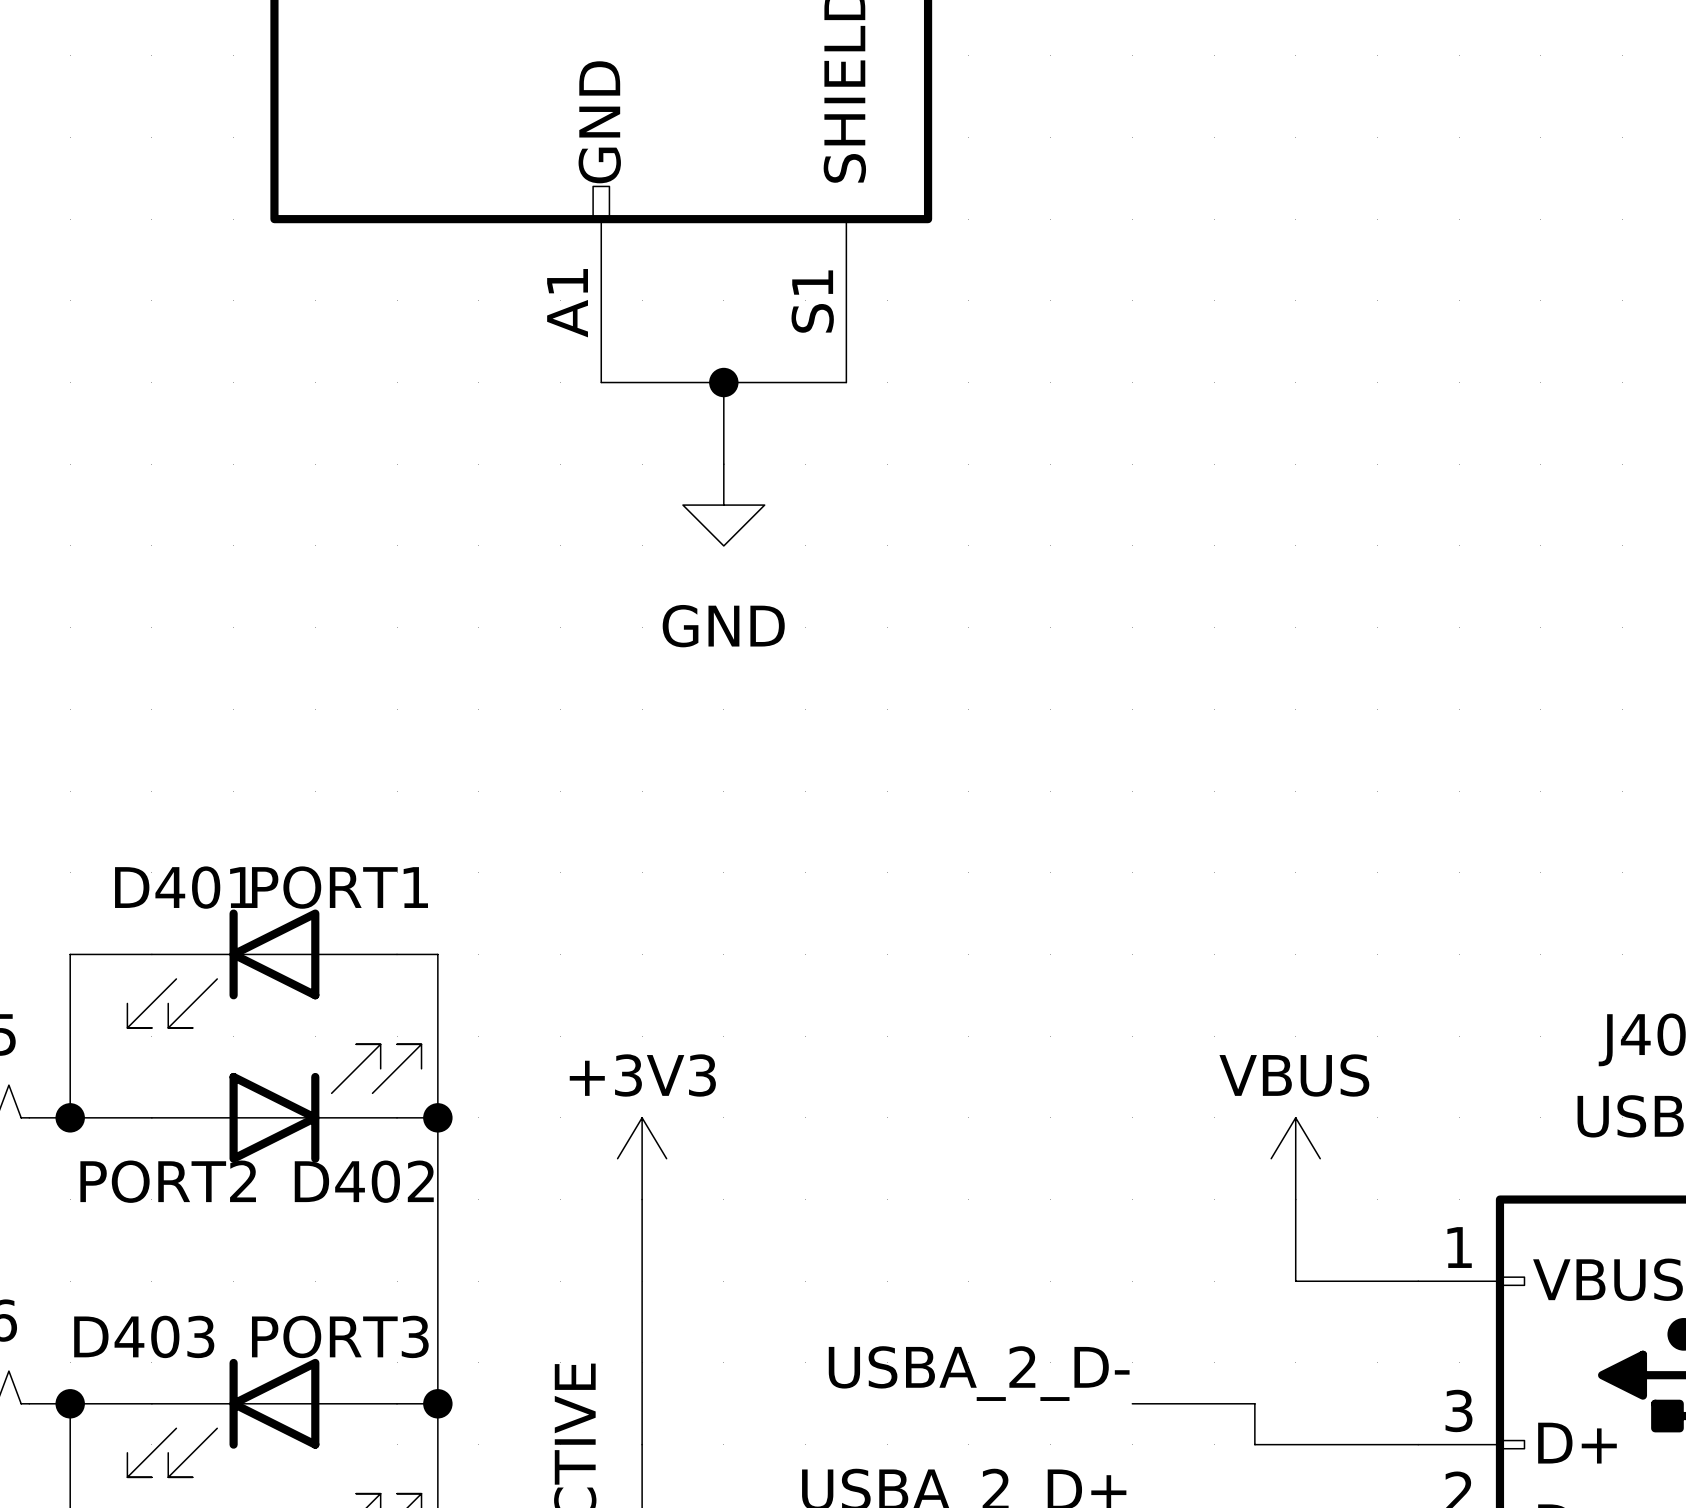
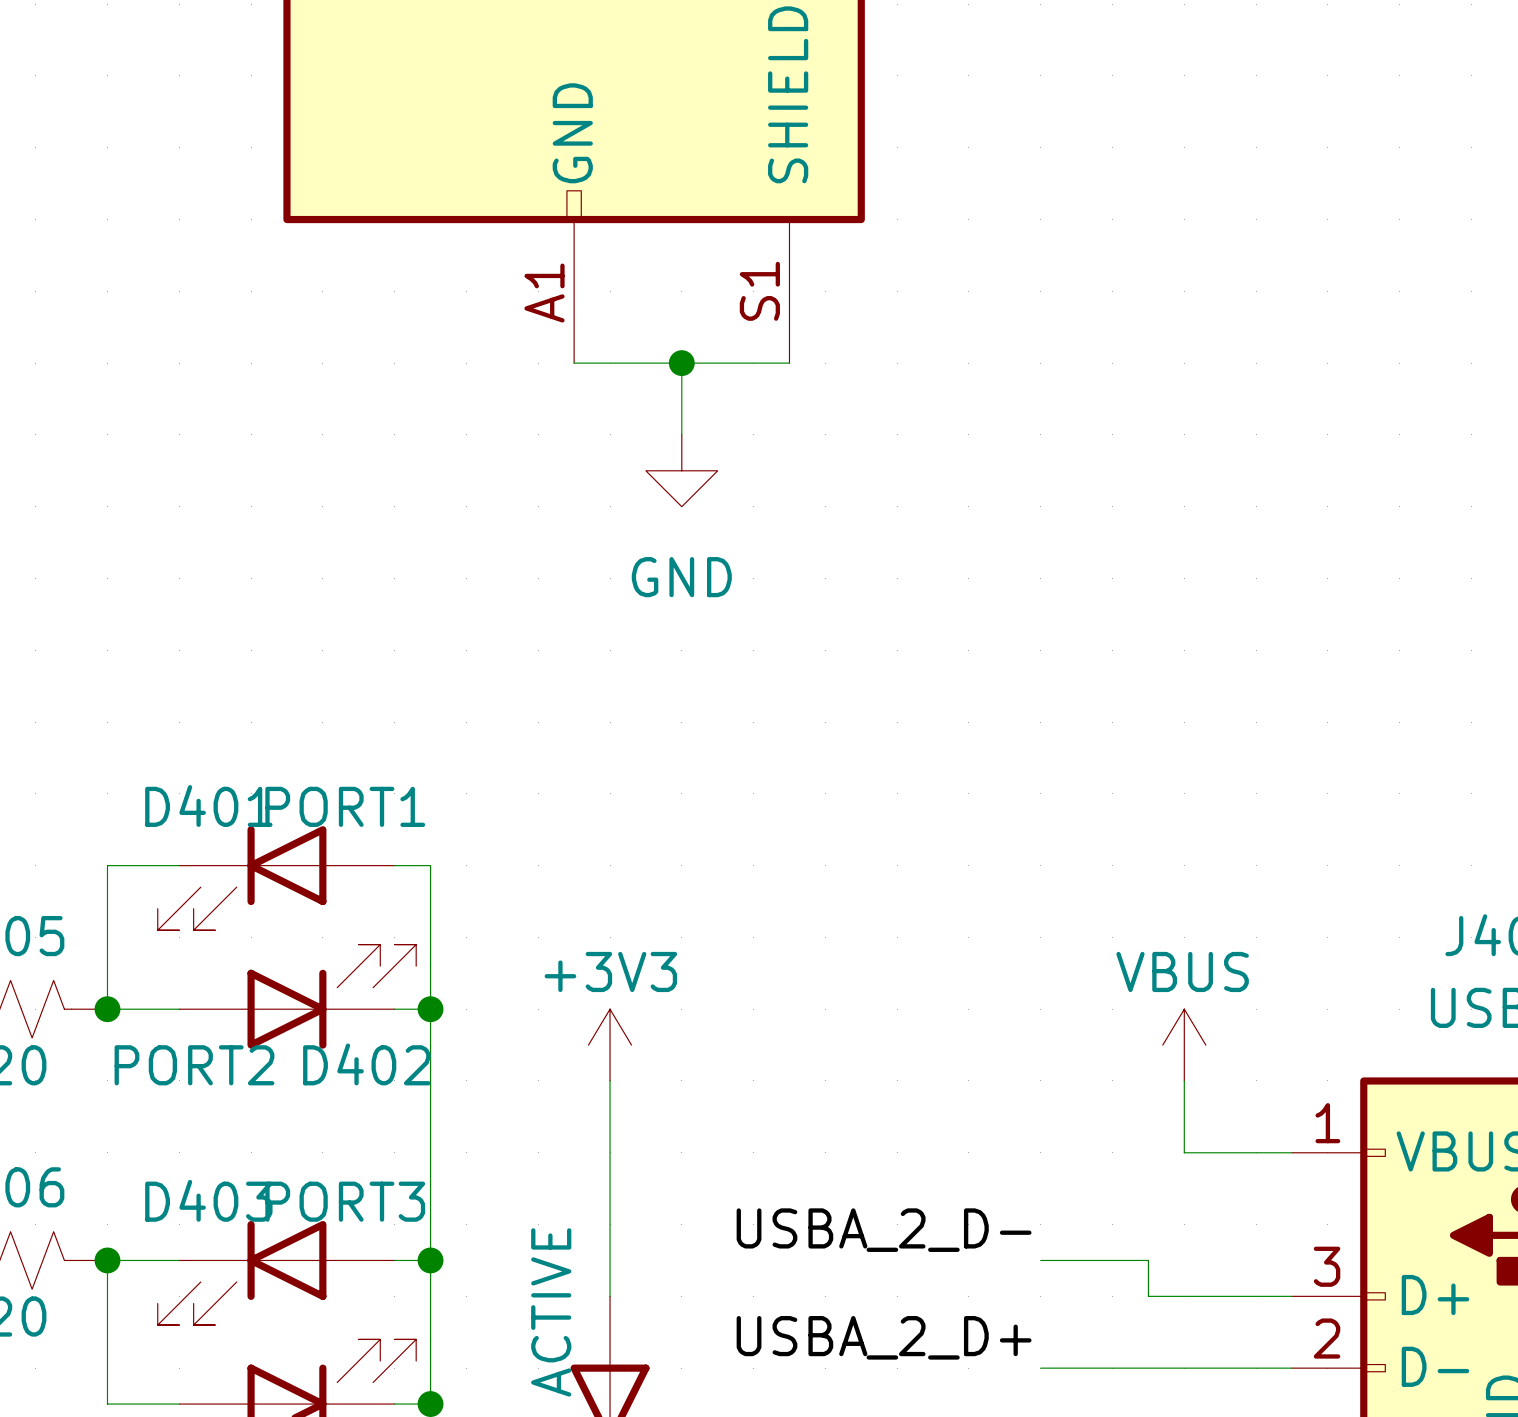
D403 name position: D403 (144, 1336) -> D403 (208, 1200)

